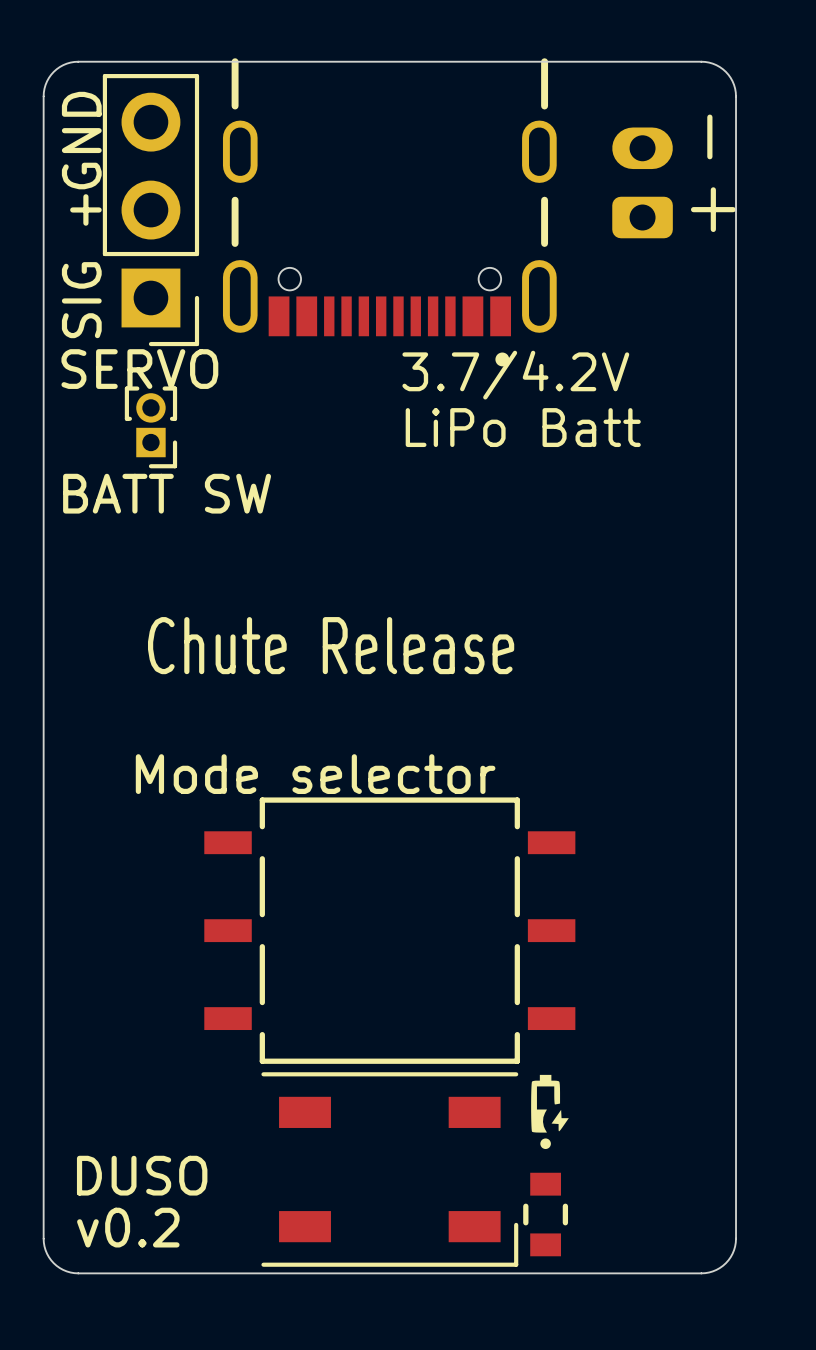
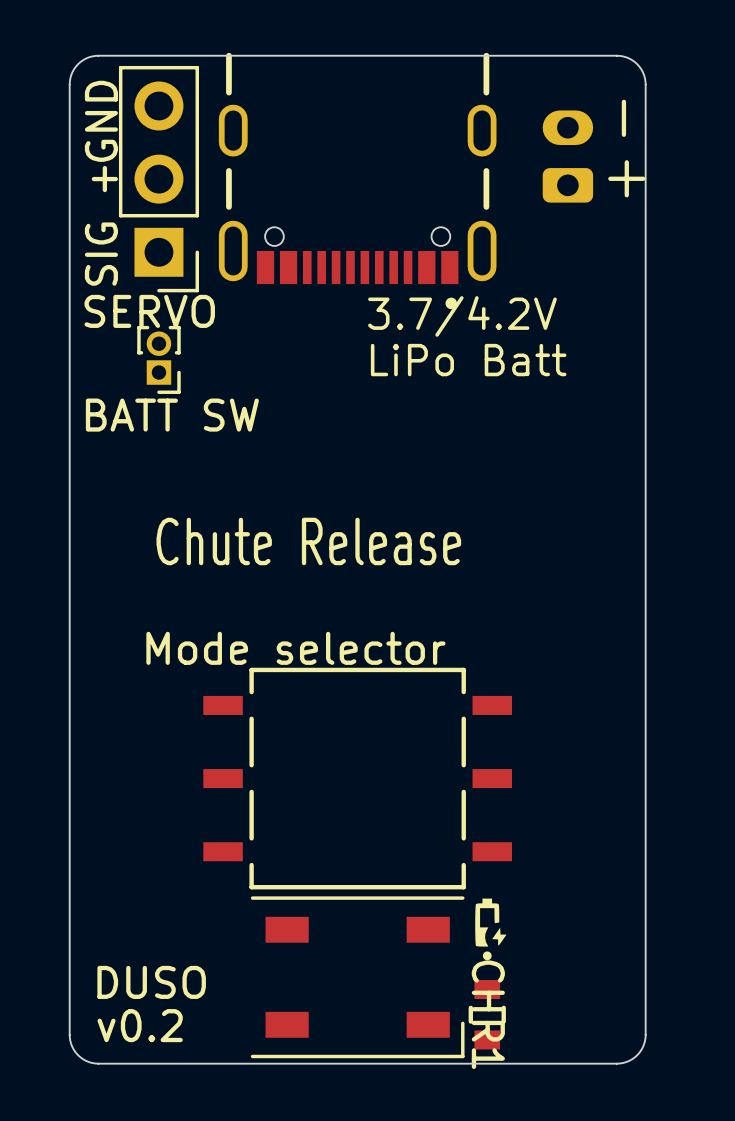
CHR1 name: none -> CHR1 (488, 1014)

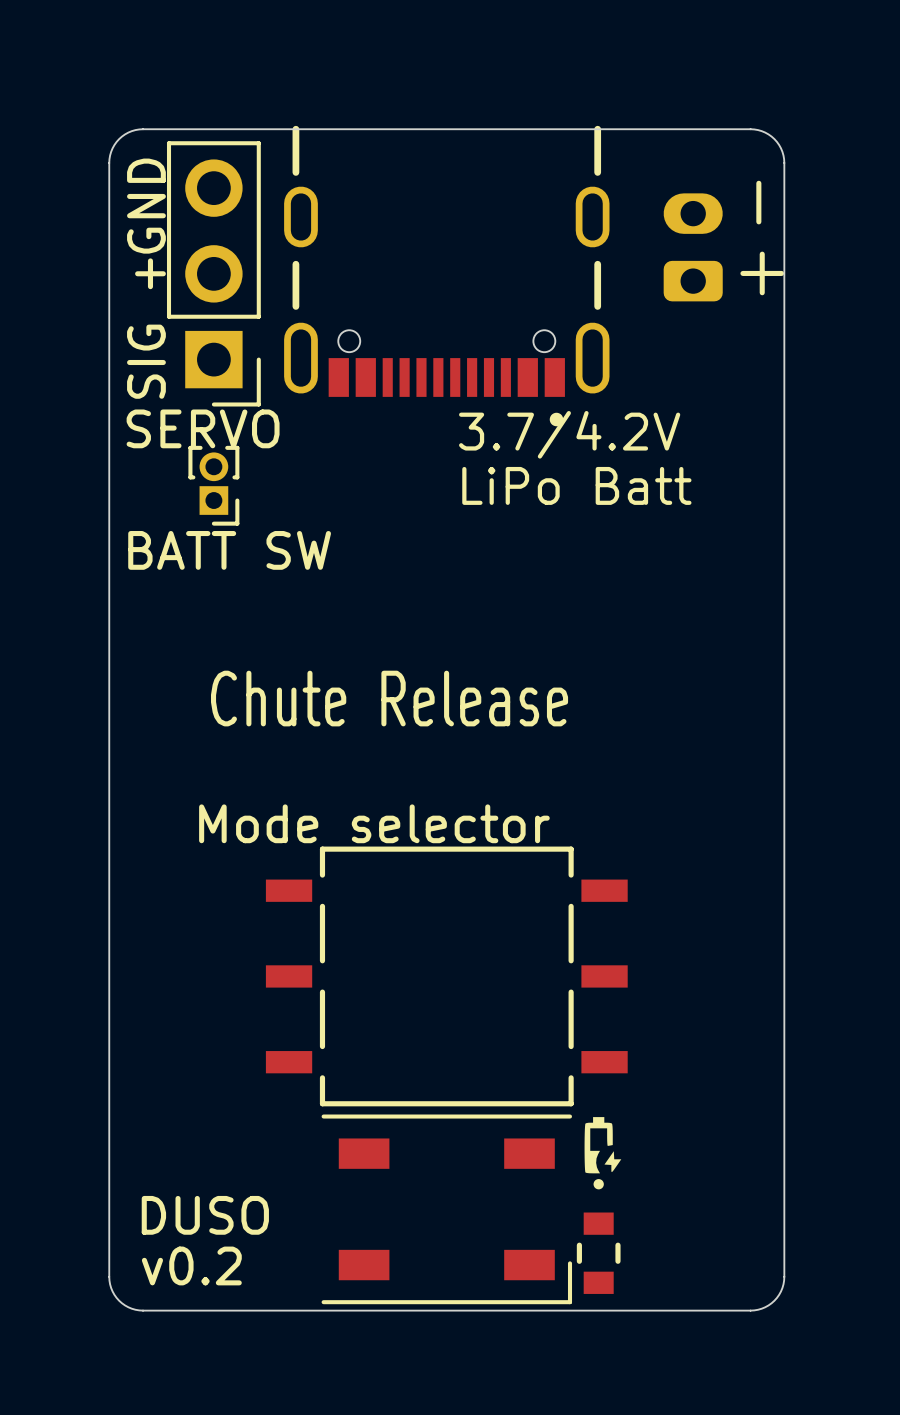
CHR1 name: CHR1 (488, 1014) -> none

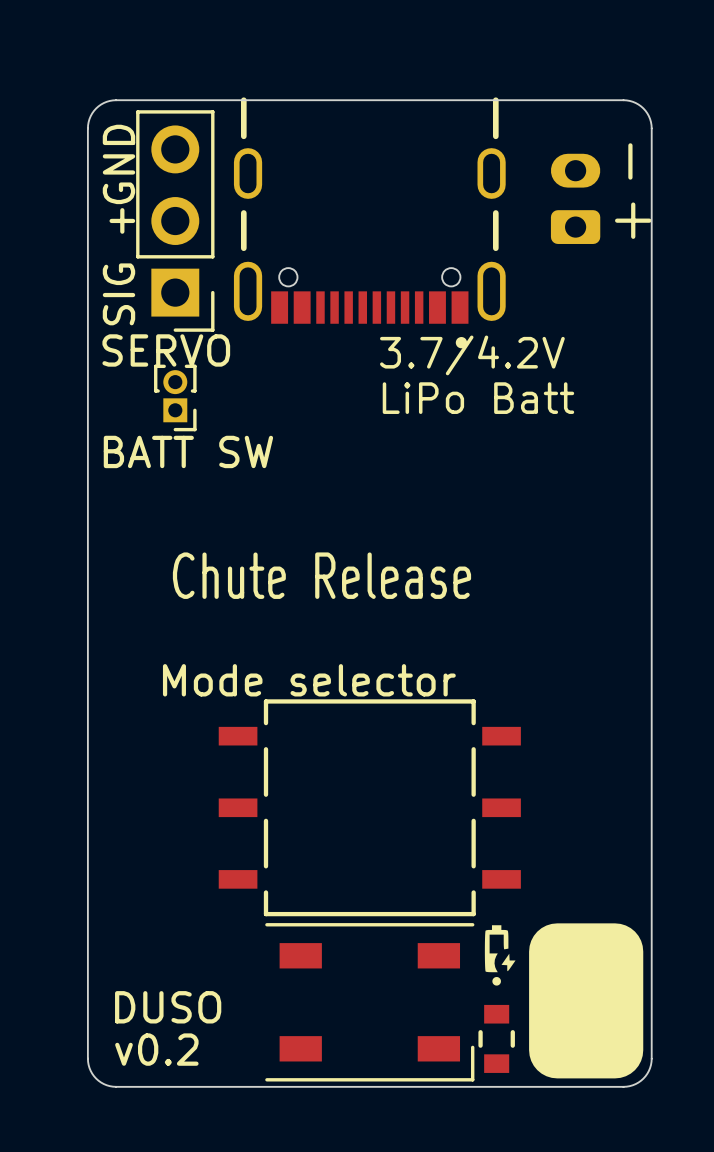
drawing: none -> [529, 923, 644, 1079]

